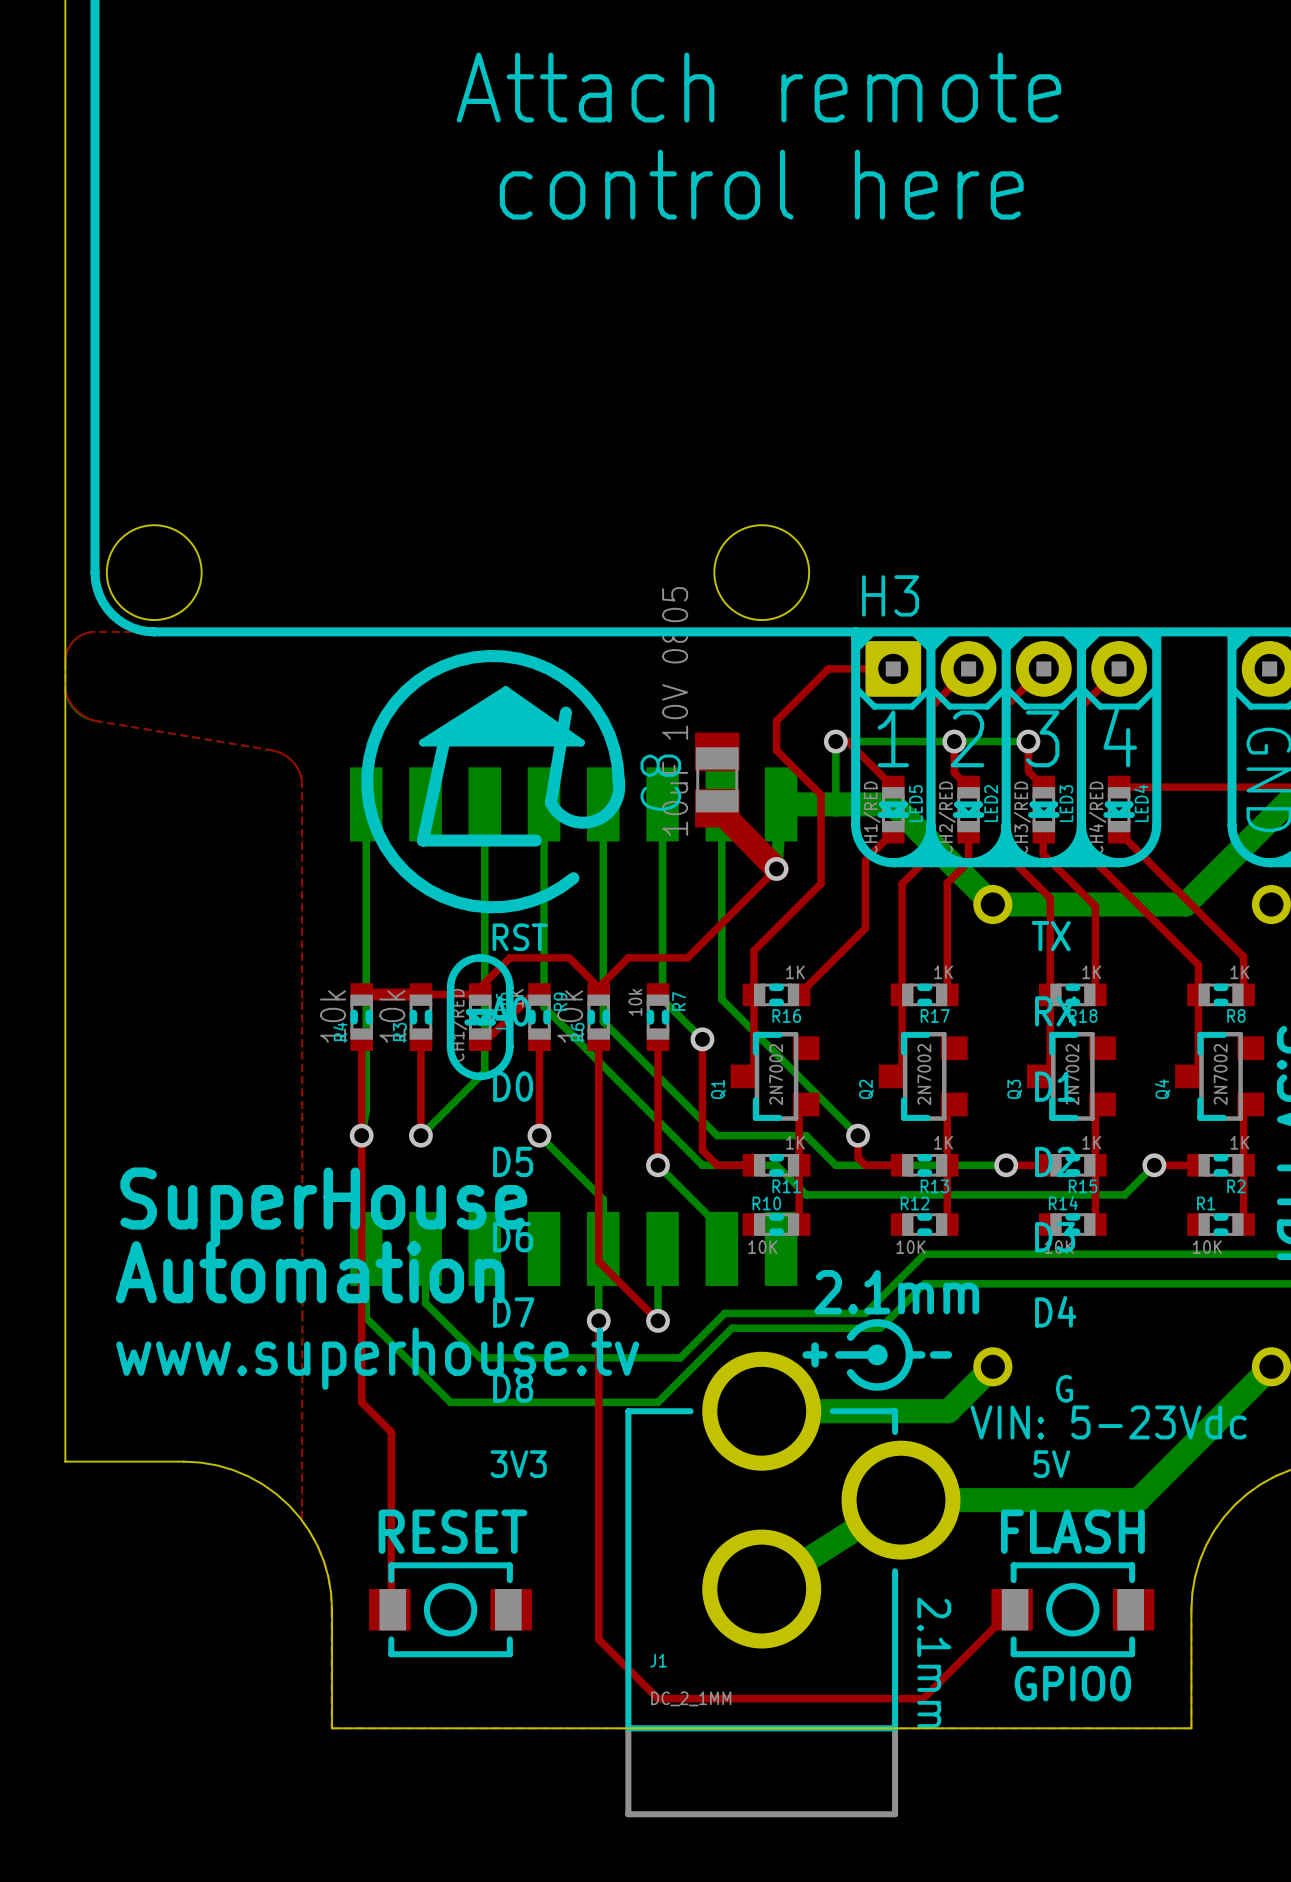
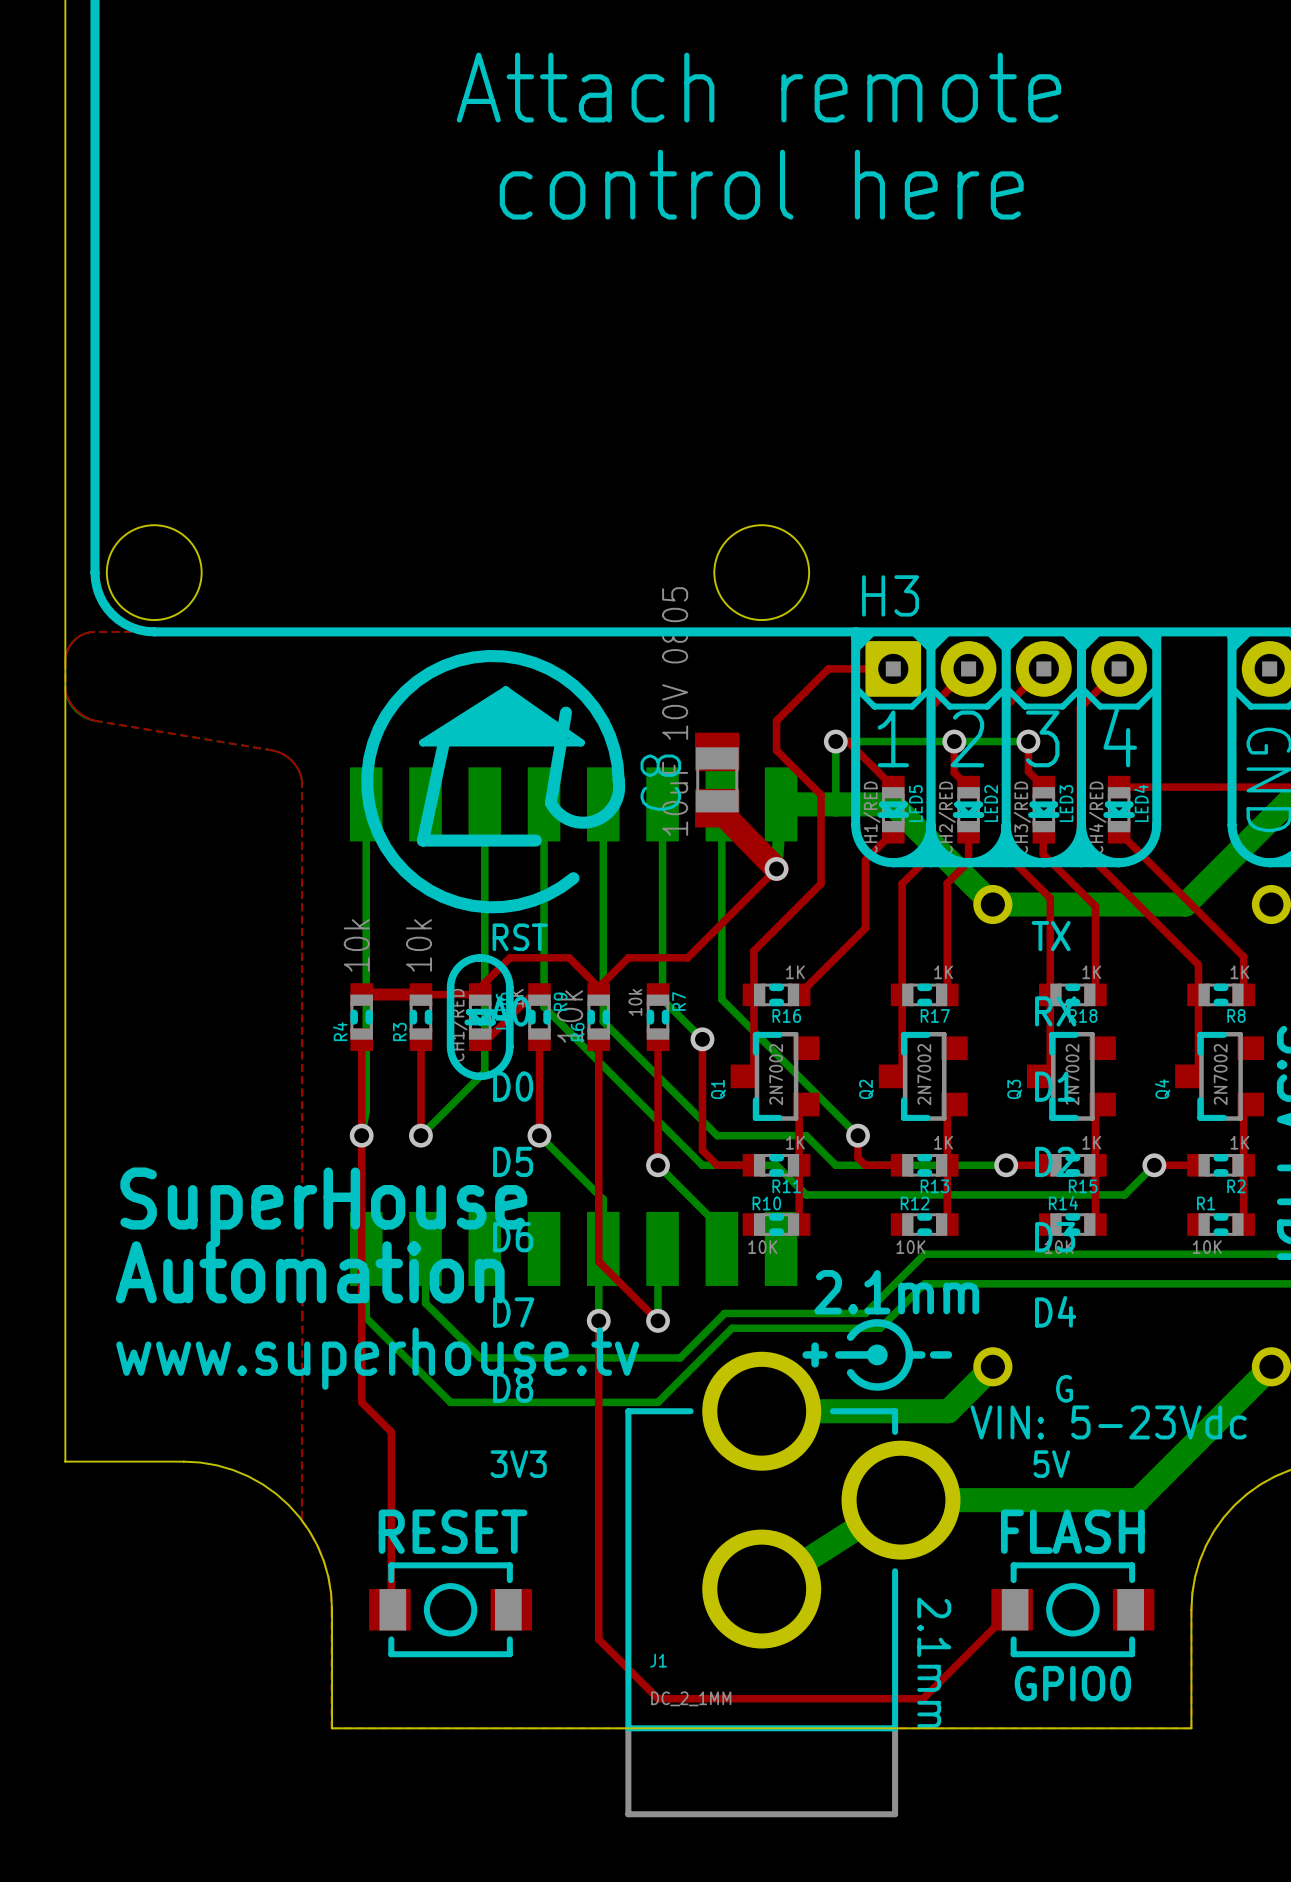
R4 value position: 10k (333, 1016) -> 10k (356, 945)
R3 value position: 10k (392, 1016) -> 10k (419, 945)

